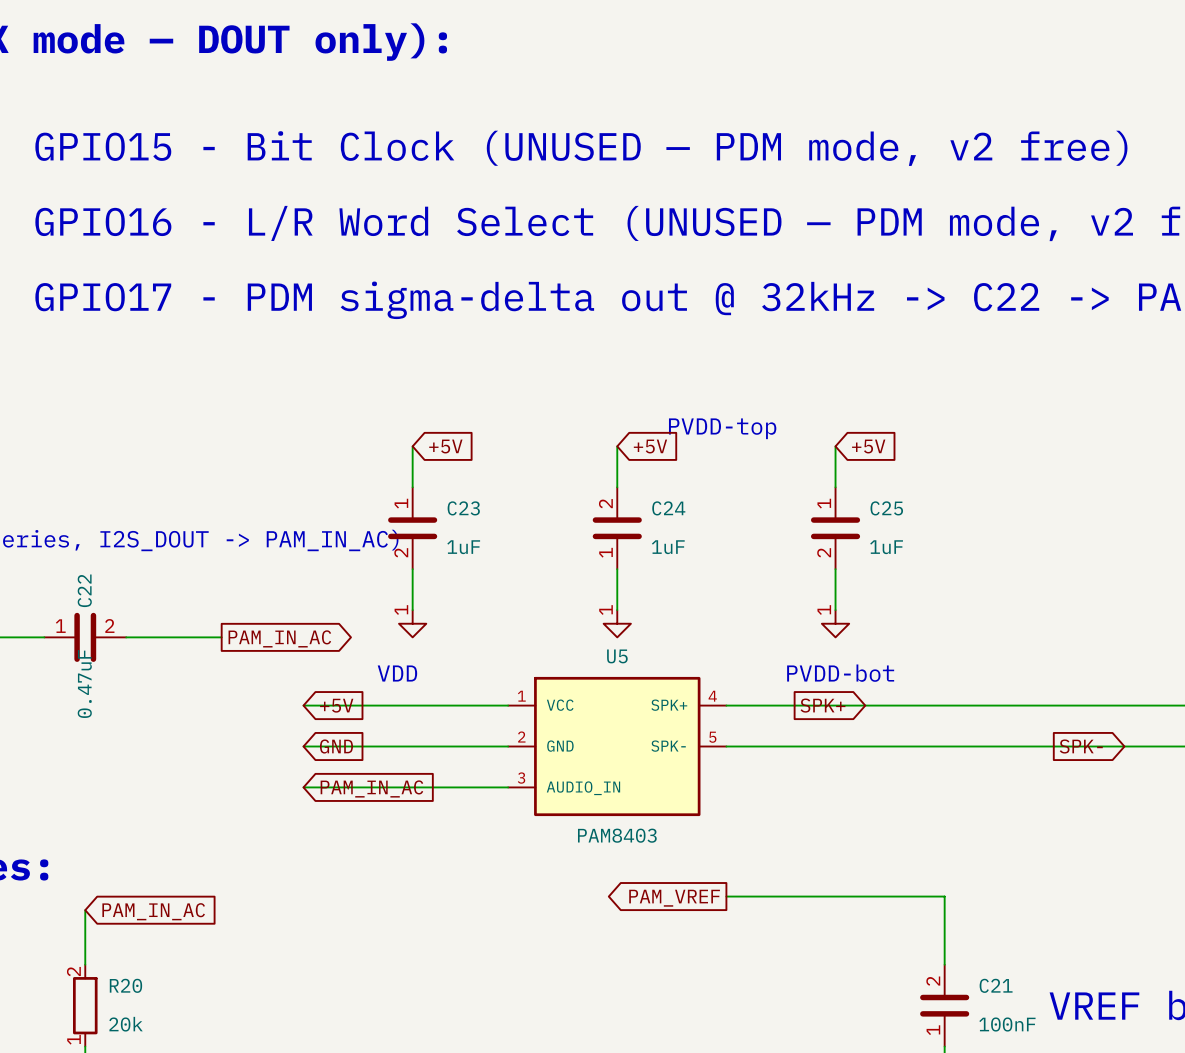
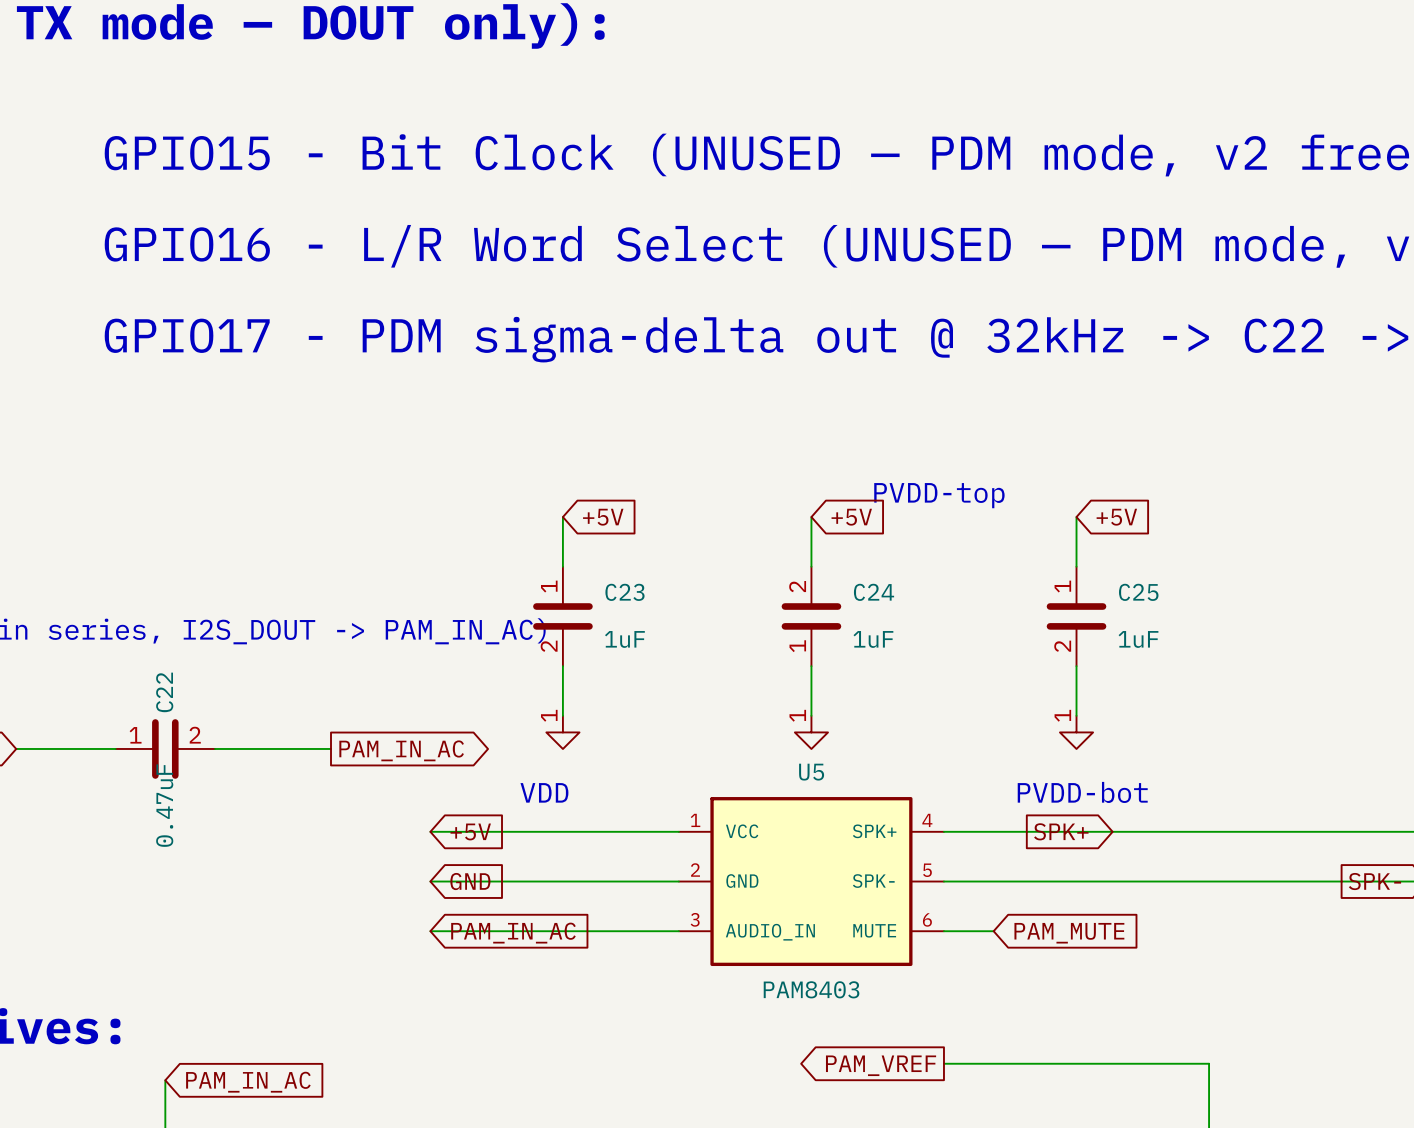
U5 symbol: [508, 676, 727, 817] -> [678, 797, 944, 967]
wire: none -> (943, 931) (993, 931)
global label: none -> PAM_MUTE (1069, 933)

